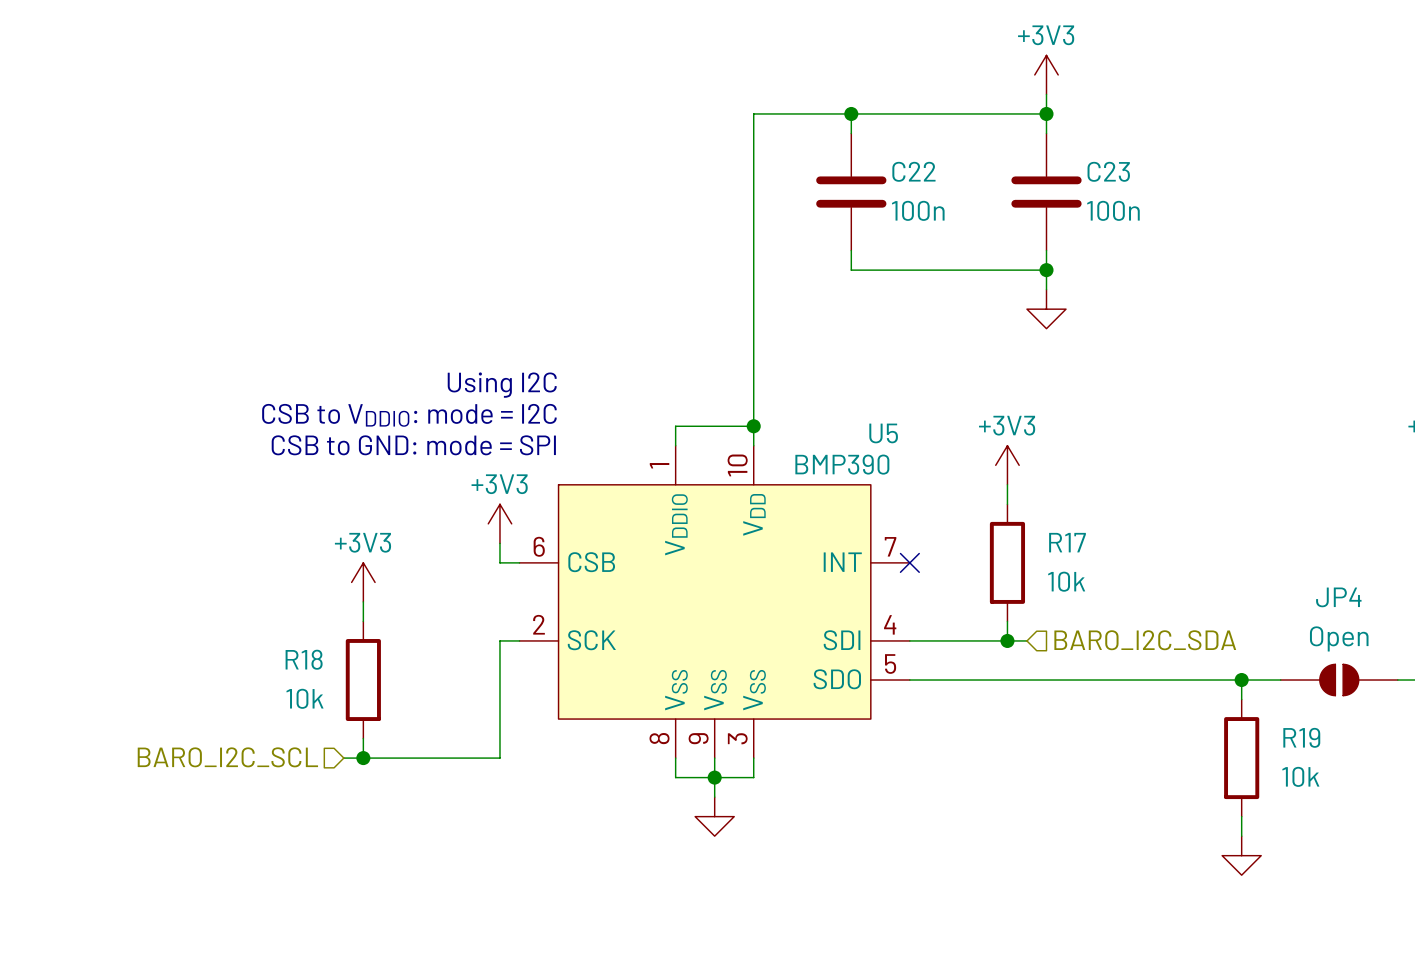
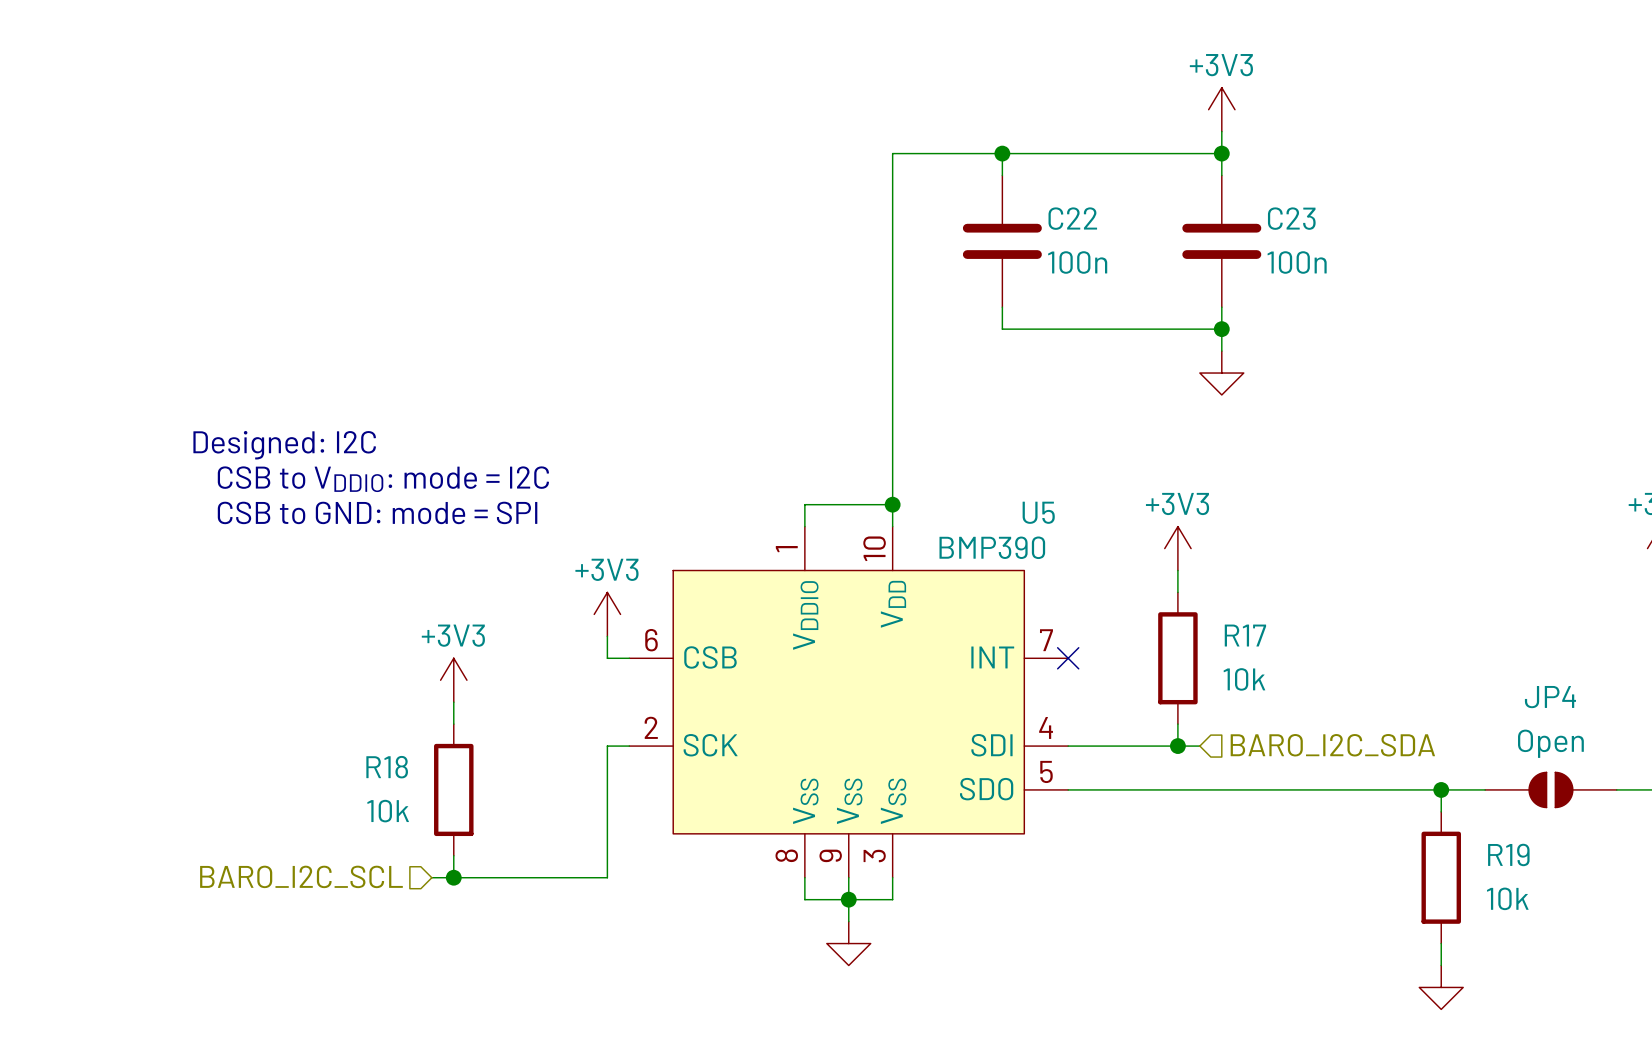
text: none -> Designed: I2C (284, 445)
text: Using I2C (502, 385) -> none
text: none -> CSB to VDDIO: mode = I2C (383, 479)
text: CSB to VDDIO: mode = I2C (409, 415) -> none
text: none -> CSB to GND: mode = SPI (377, 512)
text: CSB to GND: mode = SPI (413, 445) -> none

